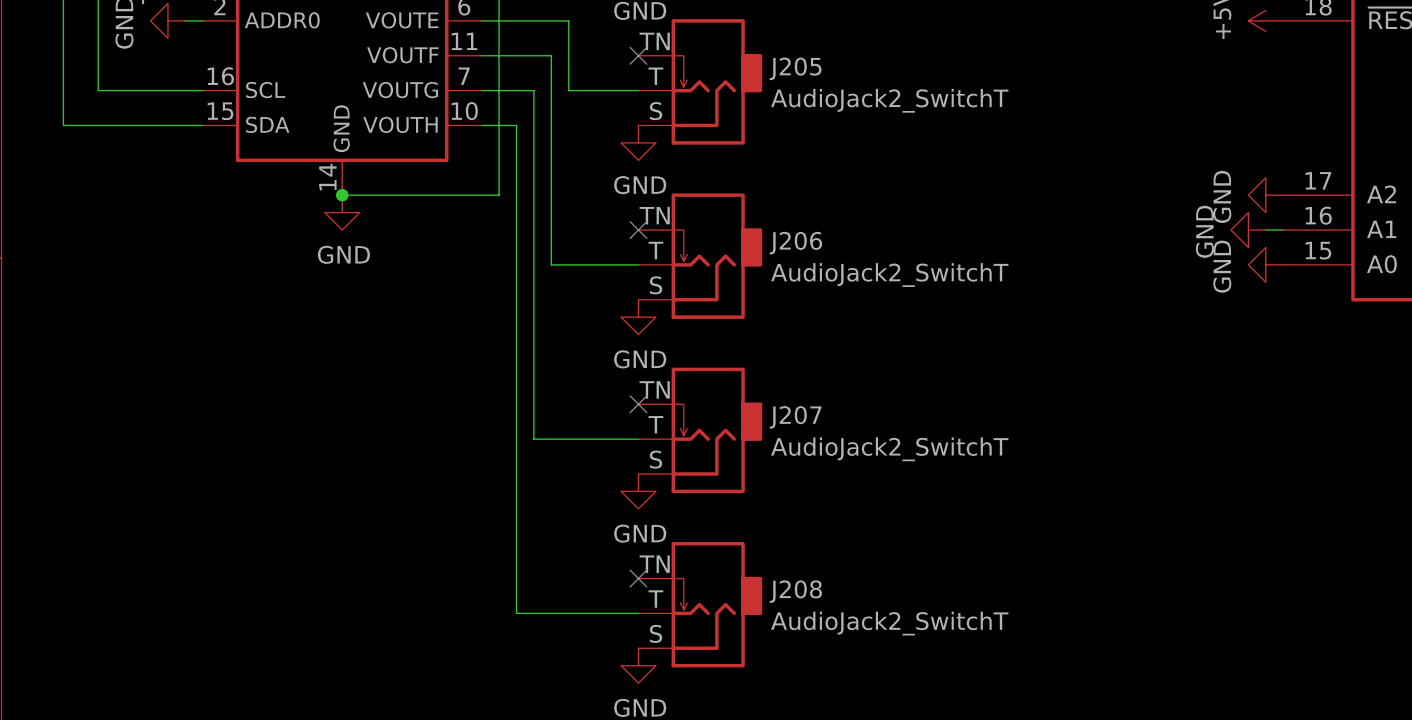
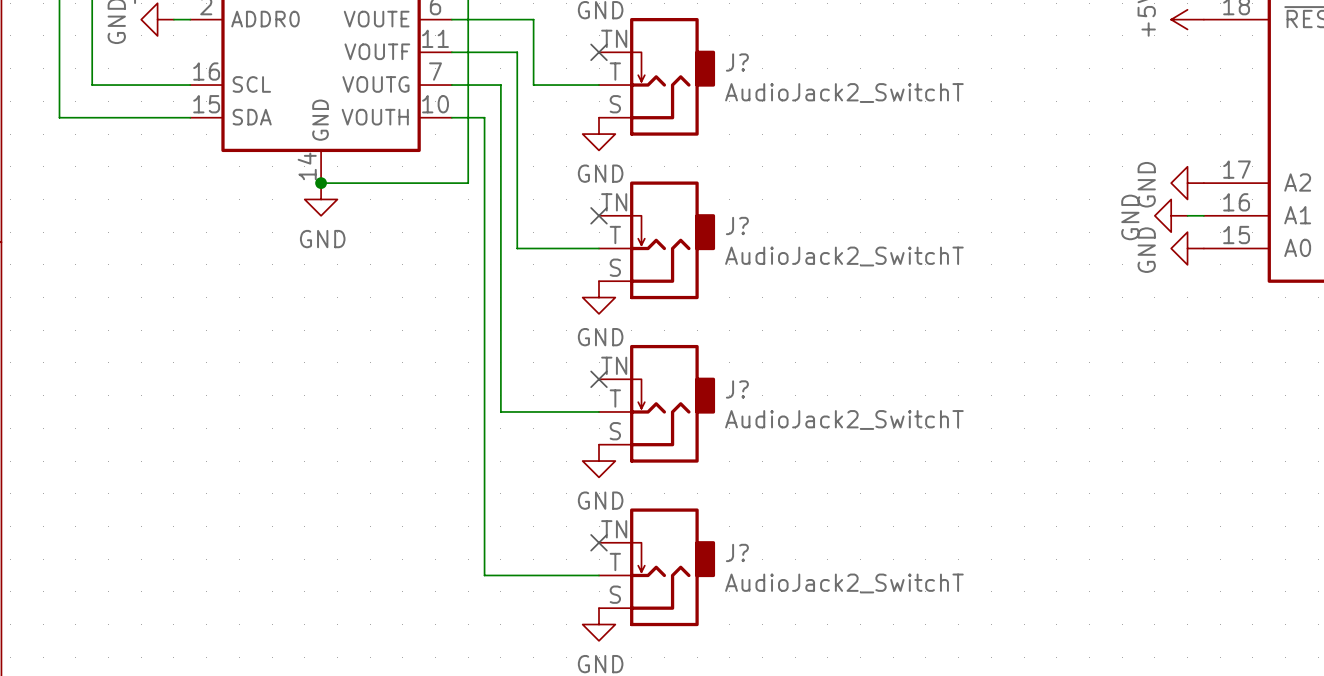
J205 name: J205 (795, 68) -> J? (737, 62)
J206 name: J206 (795, 243) -> J? (737, 225)
J207 name: J207 (795, 417) -> J? (737, 389)
J208 name: J208 (795, 591) -> J? (737, 552)

